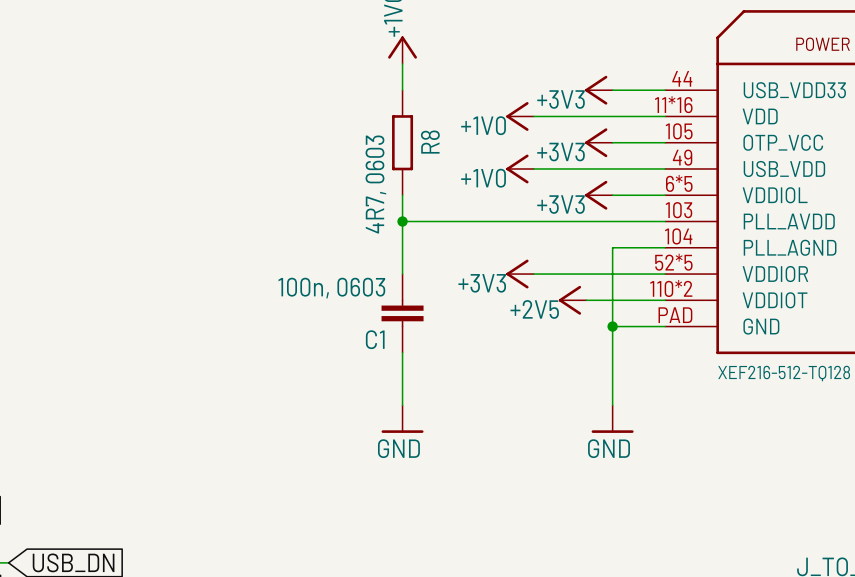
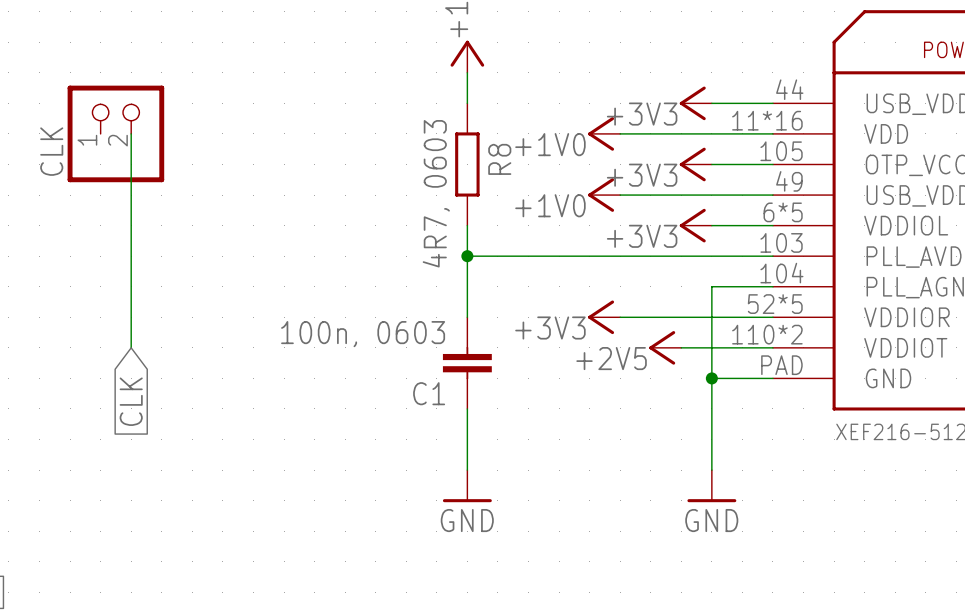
CLK: none -> (115, 133)
wire: none -> (131, 133) (131, 347)
global label: none -> CLK (131, 401)

